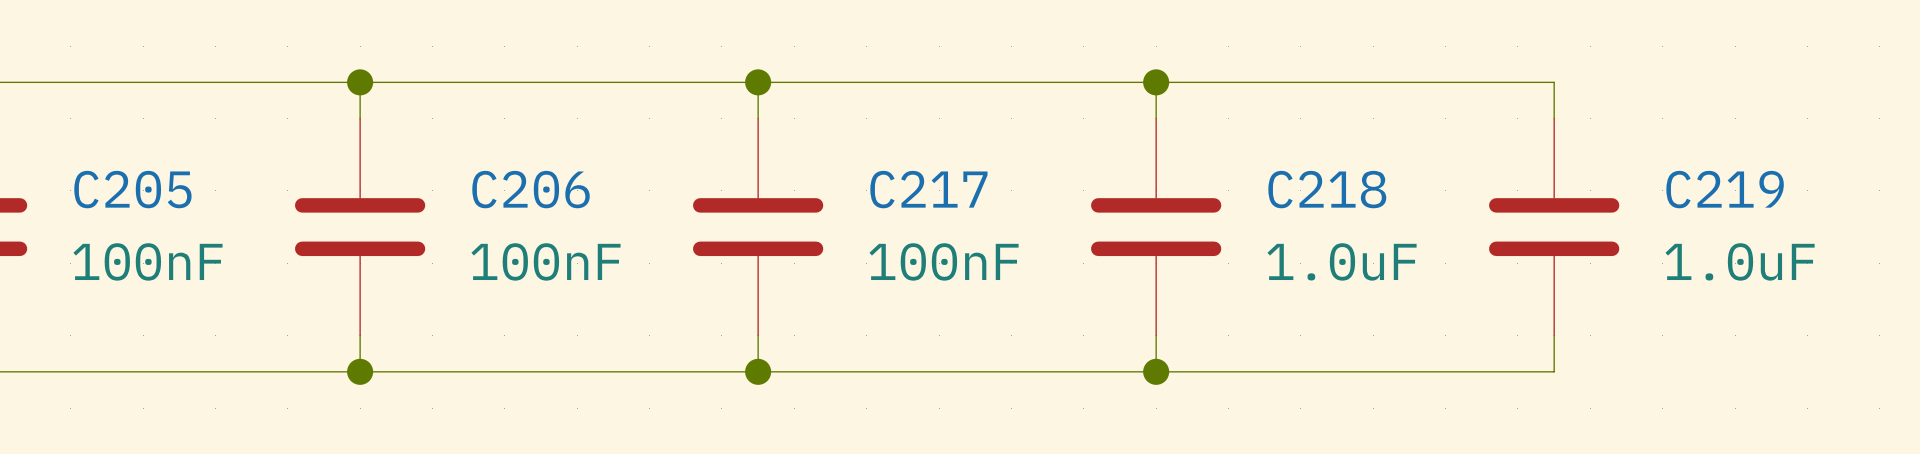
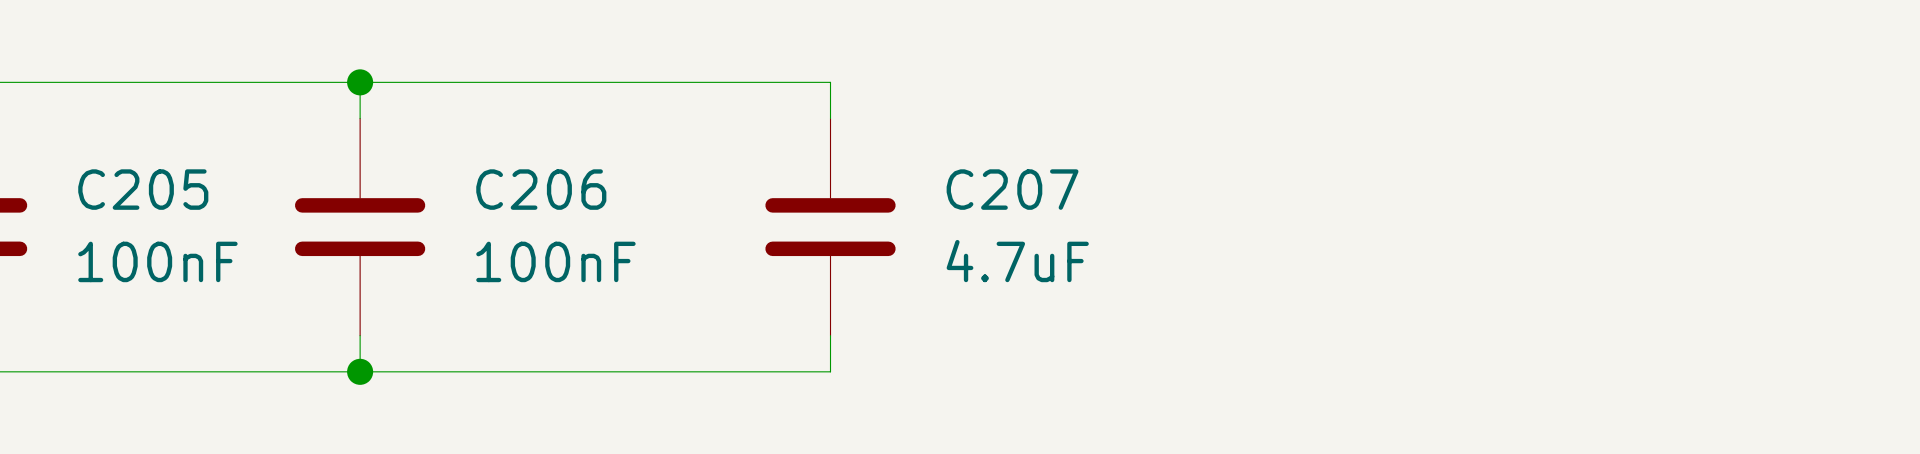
wire: (758, 82) (758, 118) -> none
junction: (758, 82) -> none
wire: (830, 82) (1554, 82) (1554, 118) -> (830, 82) (830, 118)
wire: (1156, 82) (1156, 118) -> none
junction: (1156, 82) -> none
C217: 100nF (758, 227) -> none
C207: none -> 4.7uF (830, 227)
C218: 1.0uF (1156, 227) -> none
C219: 1.0uF (1554, 227) -> none
wire: (758, 335) (758, 371) -> none
wire: (1156, 335) (1156, 371) -> none
wire: (1554, 335) (1554, 371) (830, 371) -> (830, 335) (830, 371)
junction: (758, 371) -> none
junction: (1156, 371) -> none

